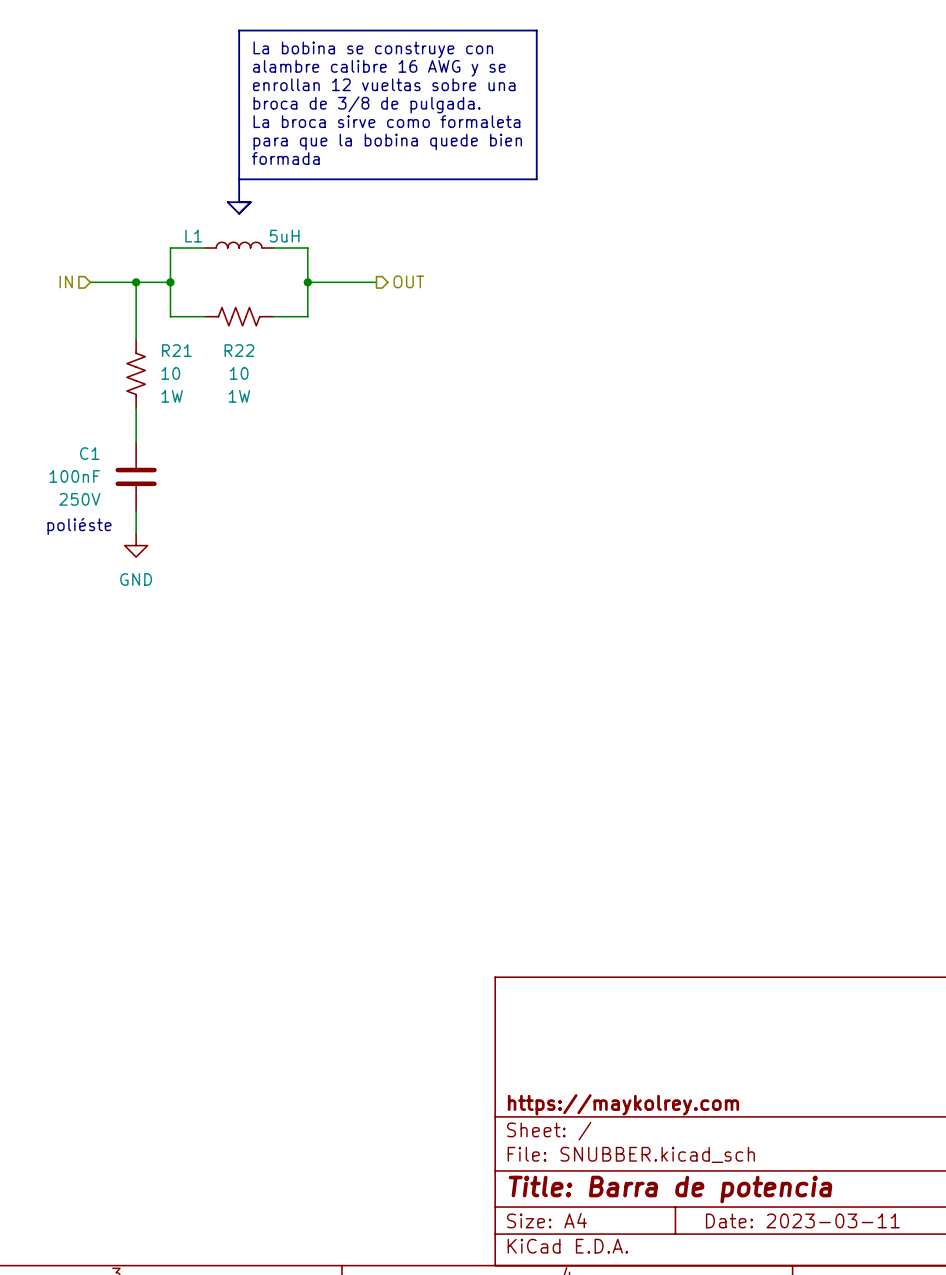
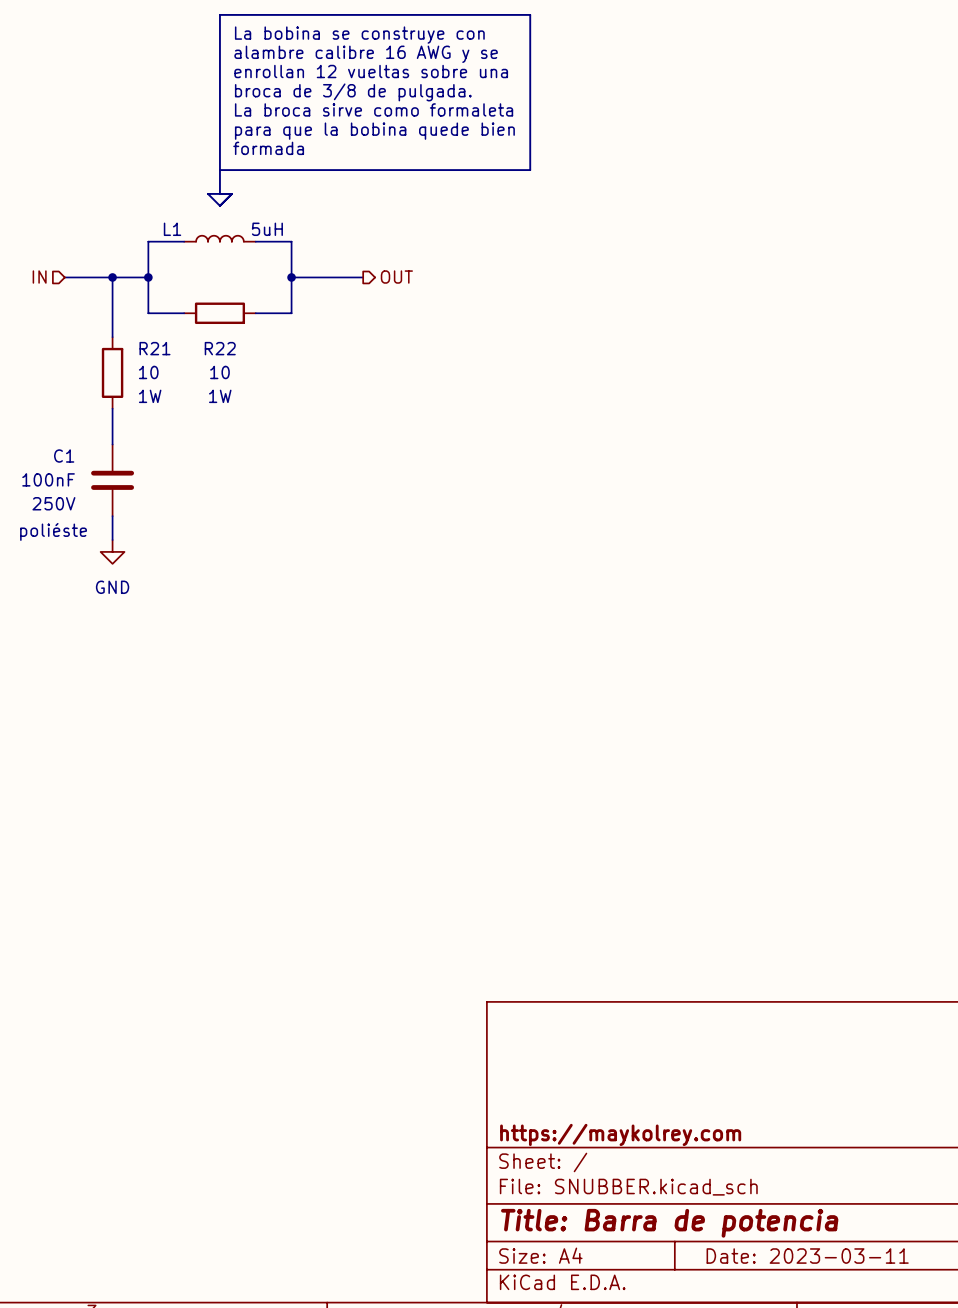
R22 symbol: [204, 307, 274, 326] -> [184, 302, 256, 325]
R21 symbol: [126, 339, 146, 409] -> [101, 337, 124, 409]

